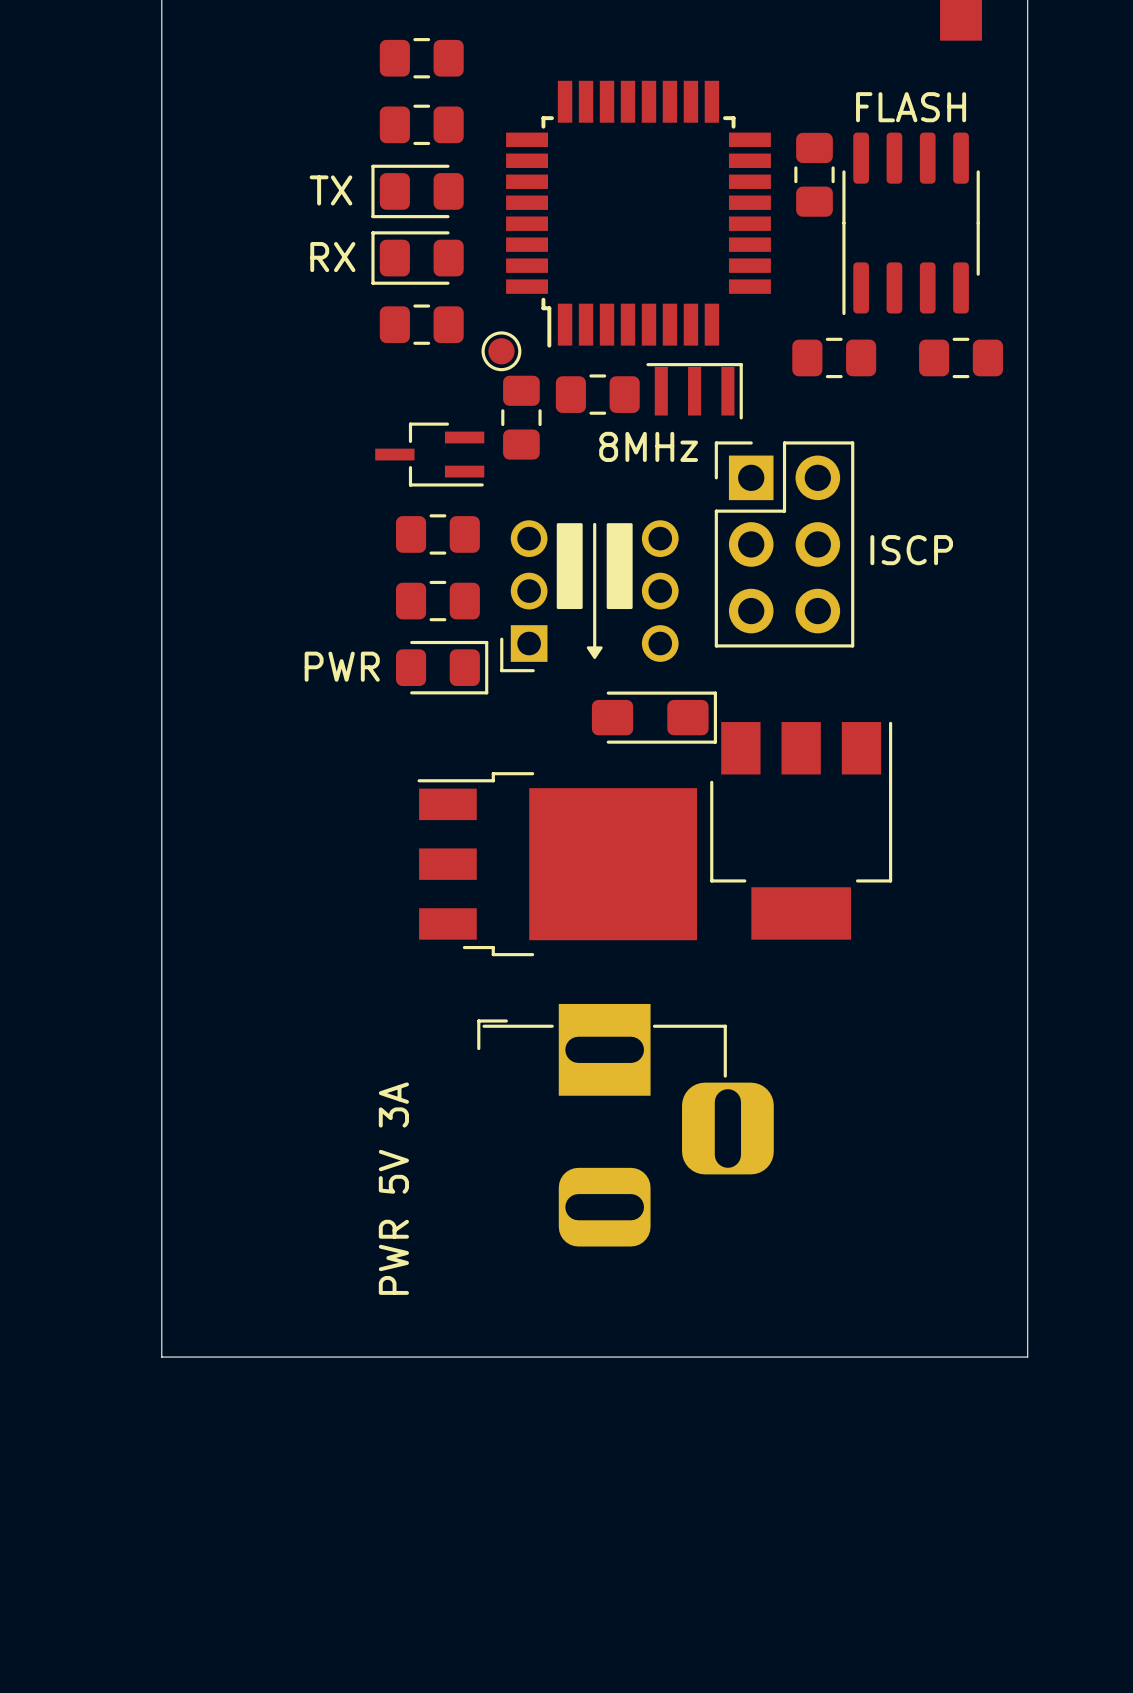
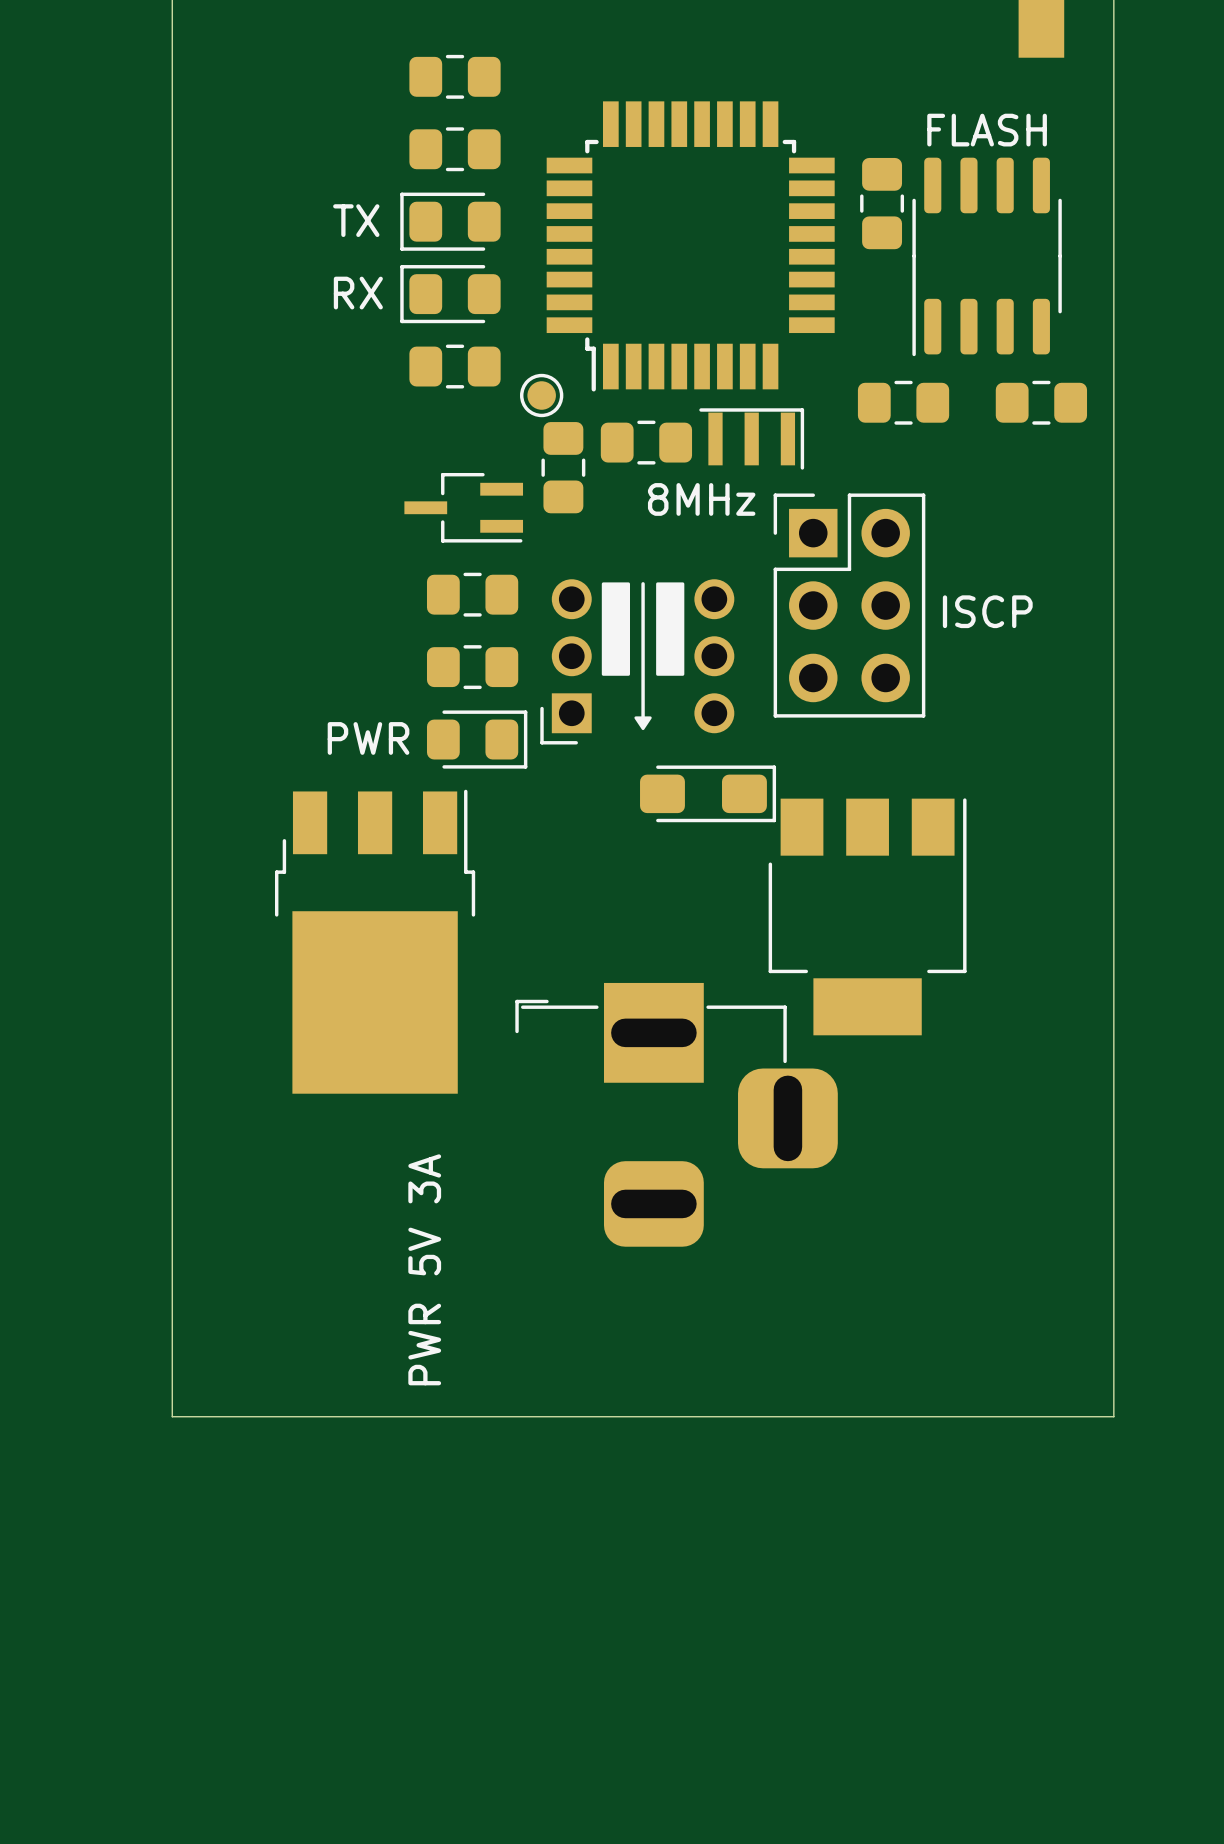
part rotation: 0° (557, 864) -> 90° clockwise (375, 941)
part position: (557, 864) -> (375, 941)
PWR 5V 3A position: (625, 1125) -> (676, 1114)
PWR 5V 3A name position: PWR 5V 3A (393, 1188) -> PWR 5V 3A (424, 1269)
board edge: (161, 1290) (161, 1357) (1027, 1357) (1027, 1290) -> (172, 1416) (1113, 1416)

